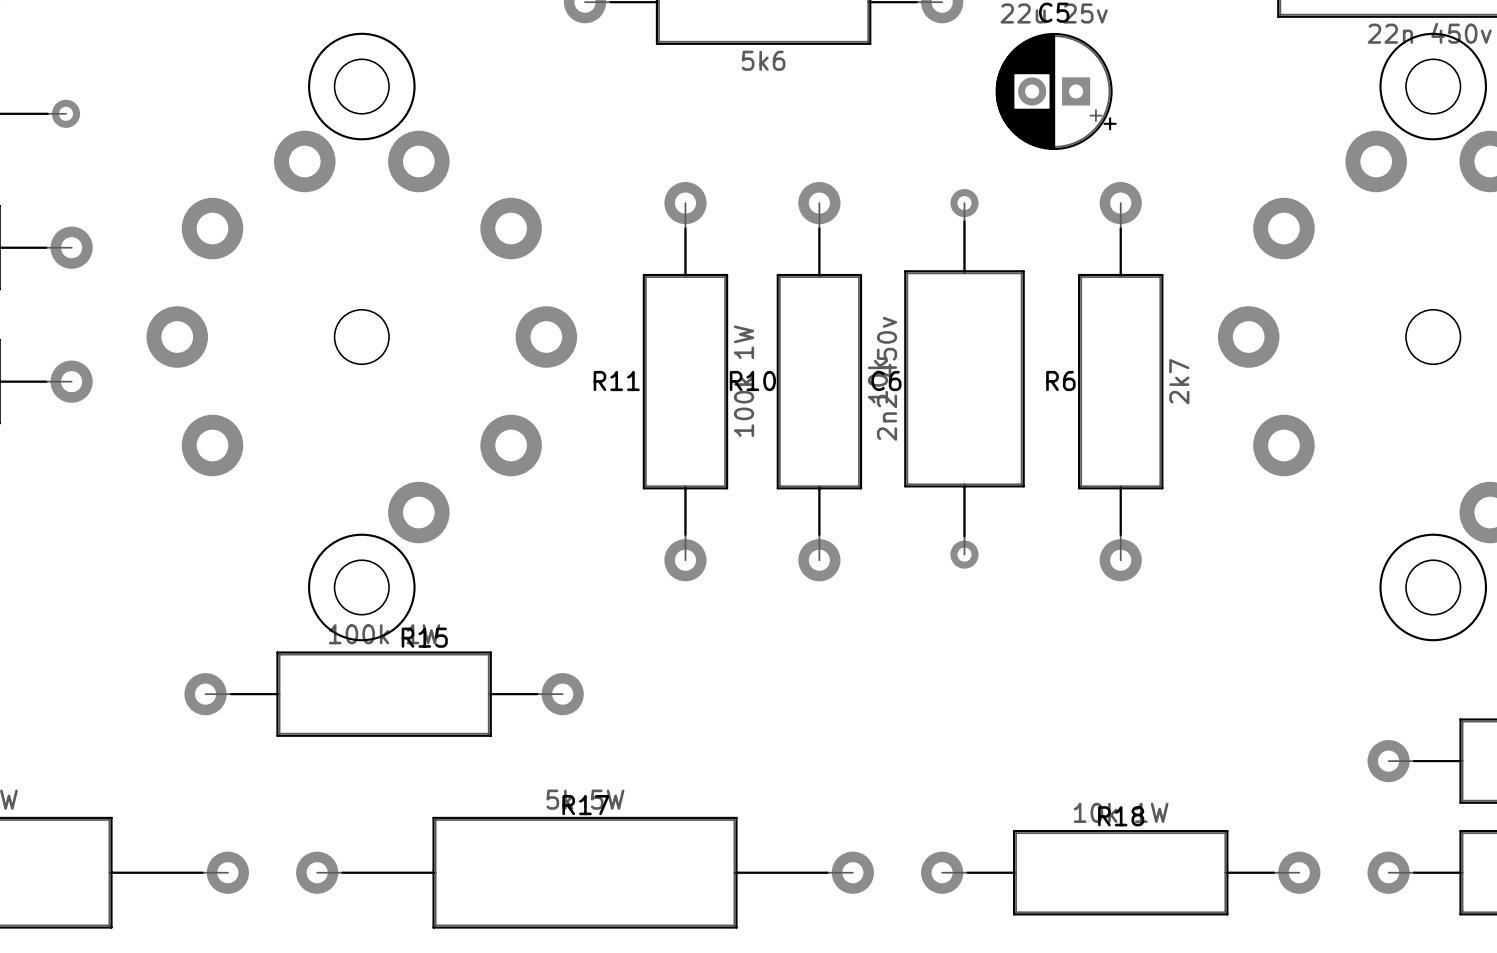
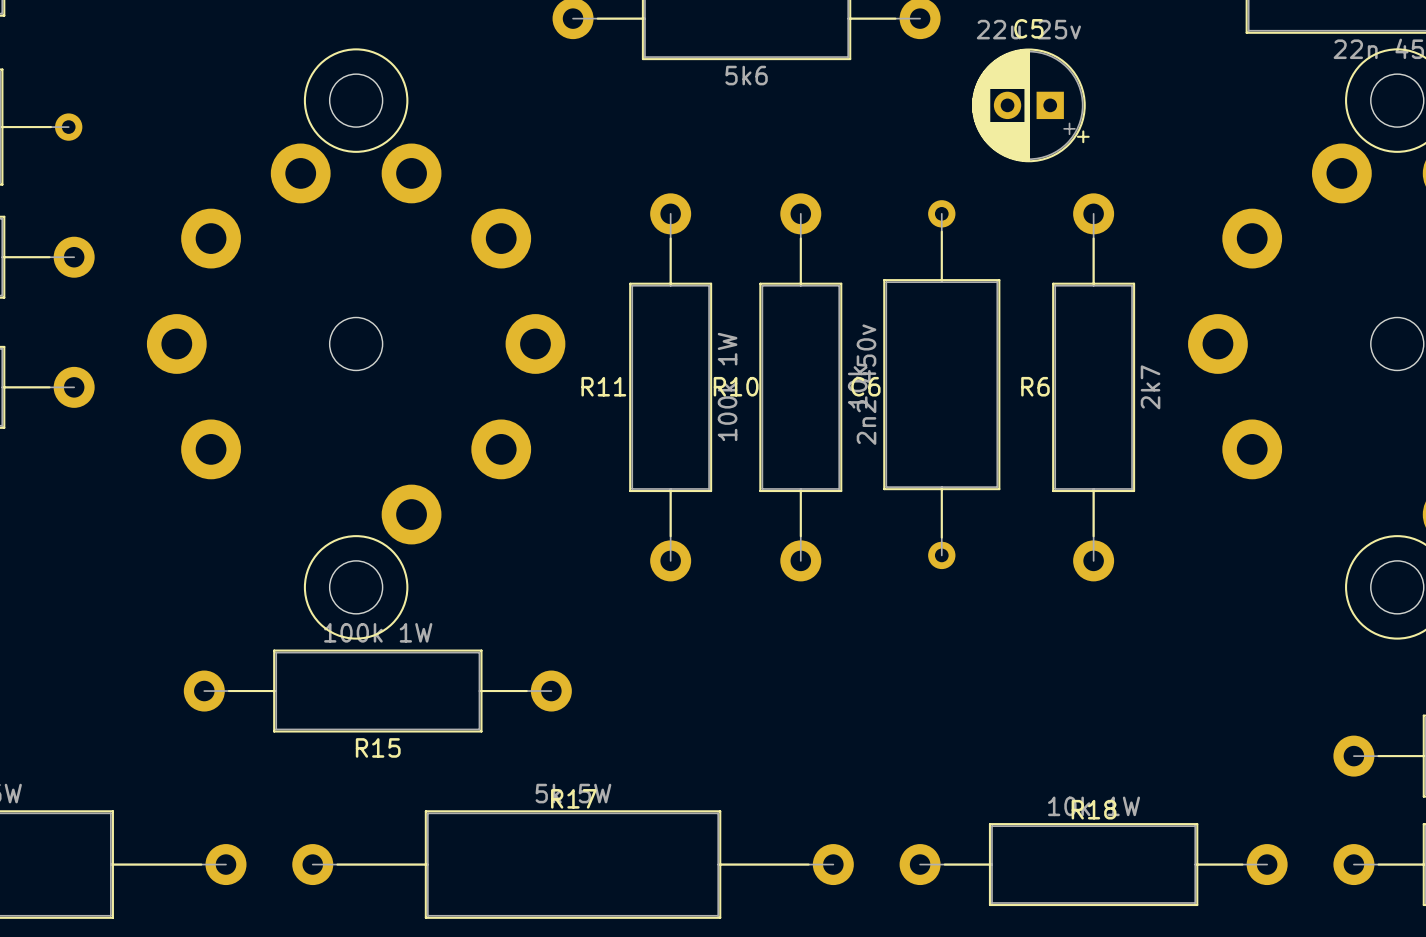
R15 name position: R15 (424, 637) -> R15 (378, 747)

